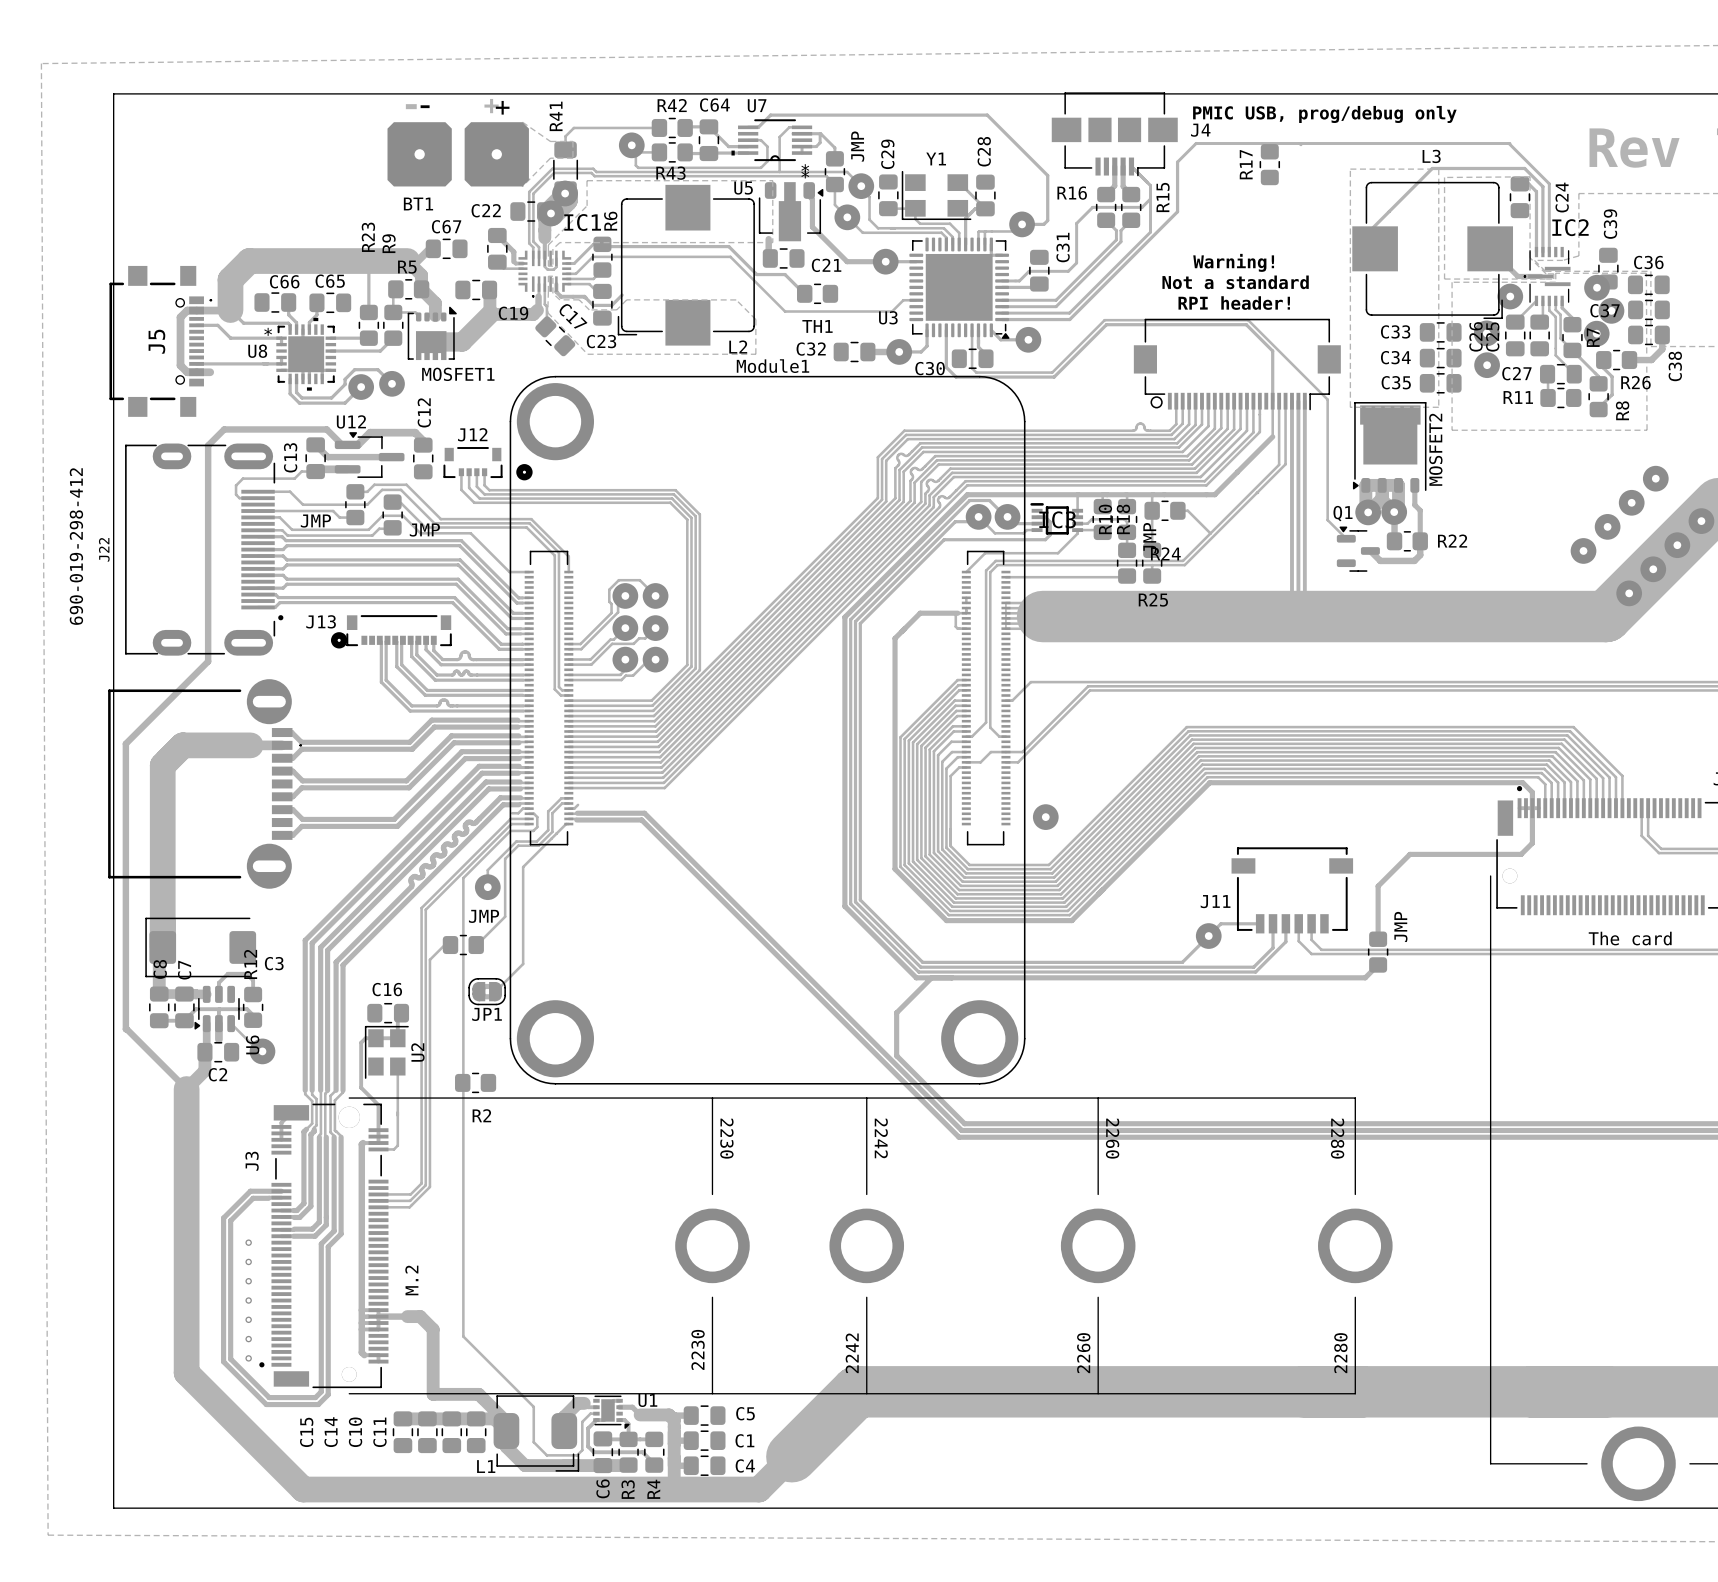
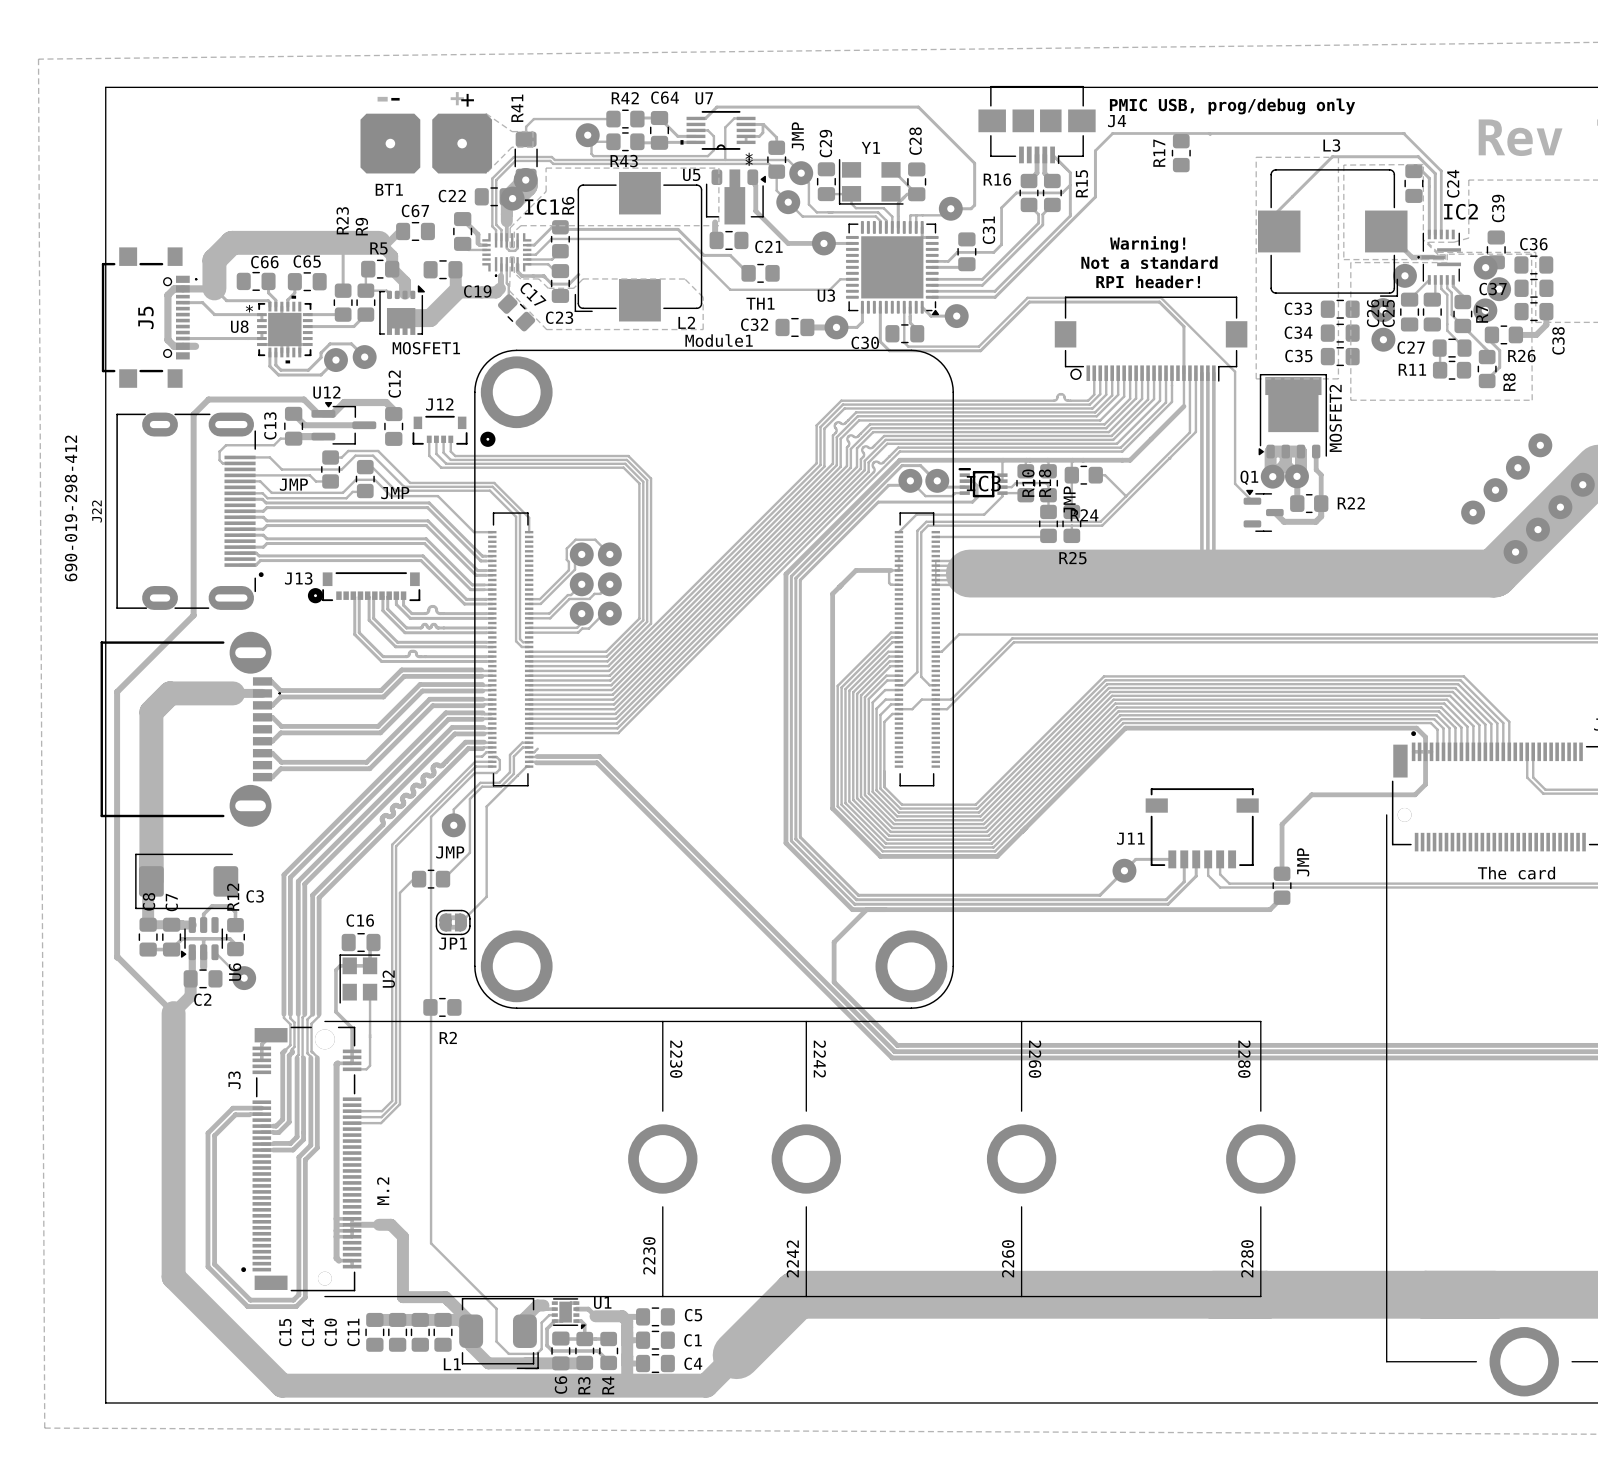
via: (1045, 817) -> none
via: (248, 1242) -> none
via: (248, 1261) -> none
via: (248, 1281) -> none
via: (248, 1300) -> none
via: (248, 1319) -> none
via: (248, 1339) -> none
via: (248, 1358) -> none

